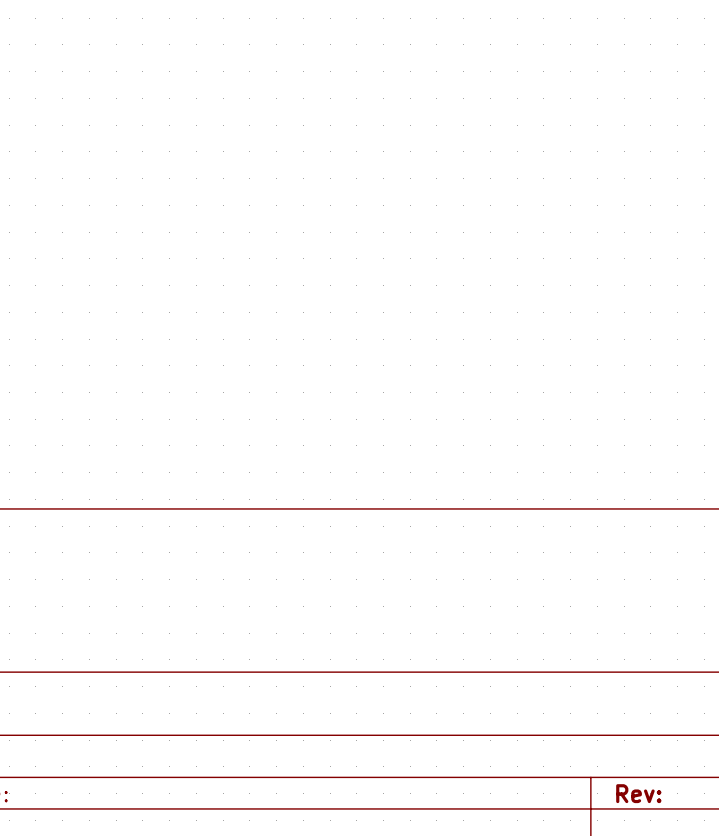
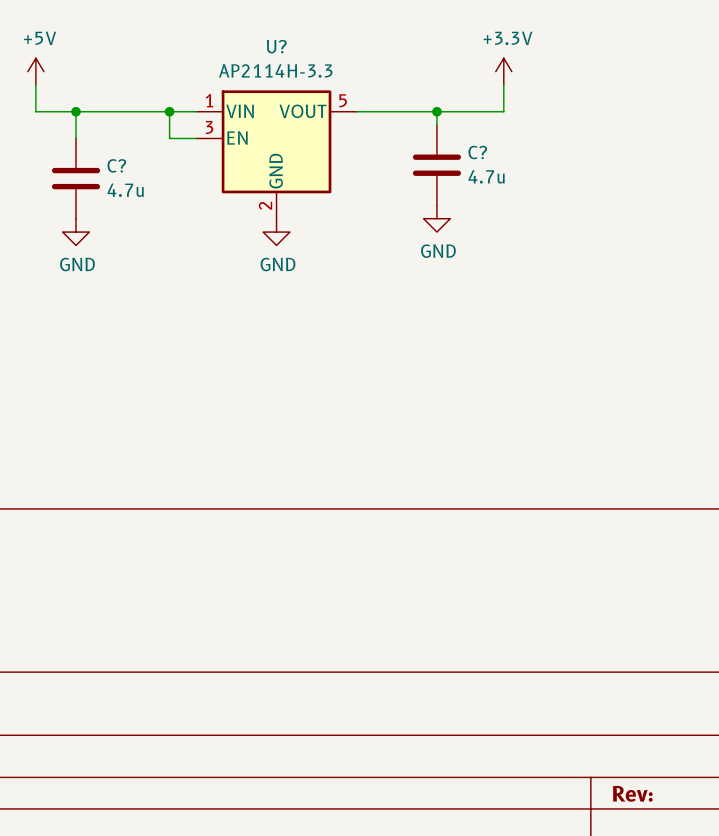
power symbol: none -> +5V (35, 71)
power symbol: none -> +3.3V (503, 71)
wire: none -> (35, 85) (35, 111) (196, 111)
wire: none -> (503, 85) (503, 111) (356, 111)
wire: none -> (76, 111) (76, 138)
junction: none -> (76, 111)
wire: none -> (169, 111) (169, 138) (196, 138)
junction: none -> (169, 111)
wire: none -> (436, 111) (436, 125)
junction: none -> (436, 111)
U?: none -> AP2114H-3.3 (276, 154)
C?: none -> 4.7u (436, 165)
C?: none -> 4.7u (76, 178)
power symbol: none -> GND (436, 218)
power symbol: none -> GND (76, 232)
power symbol: none -> GND (276, 232)

